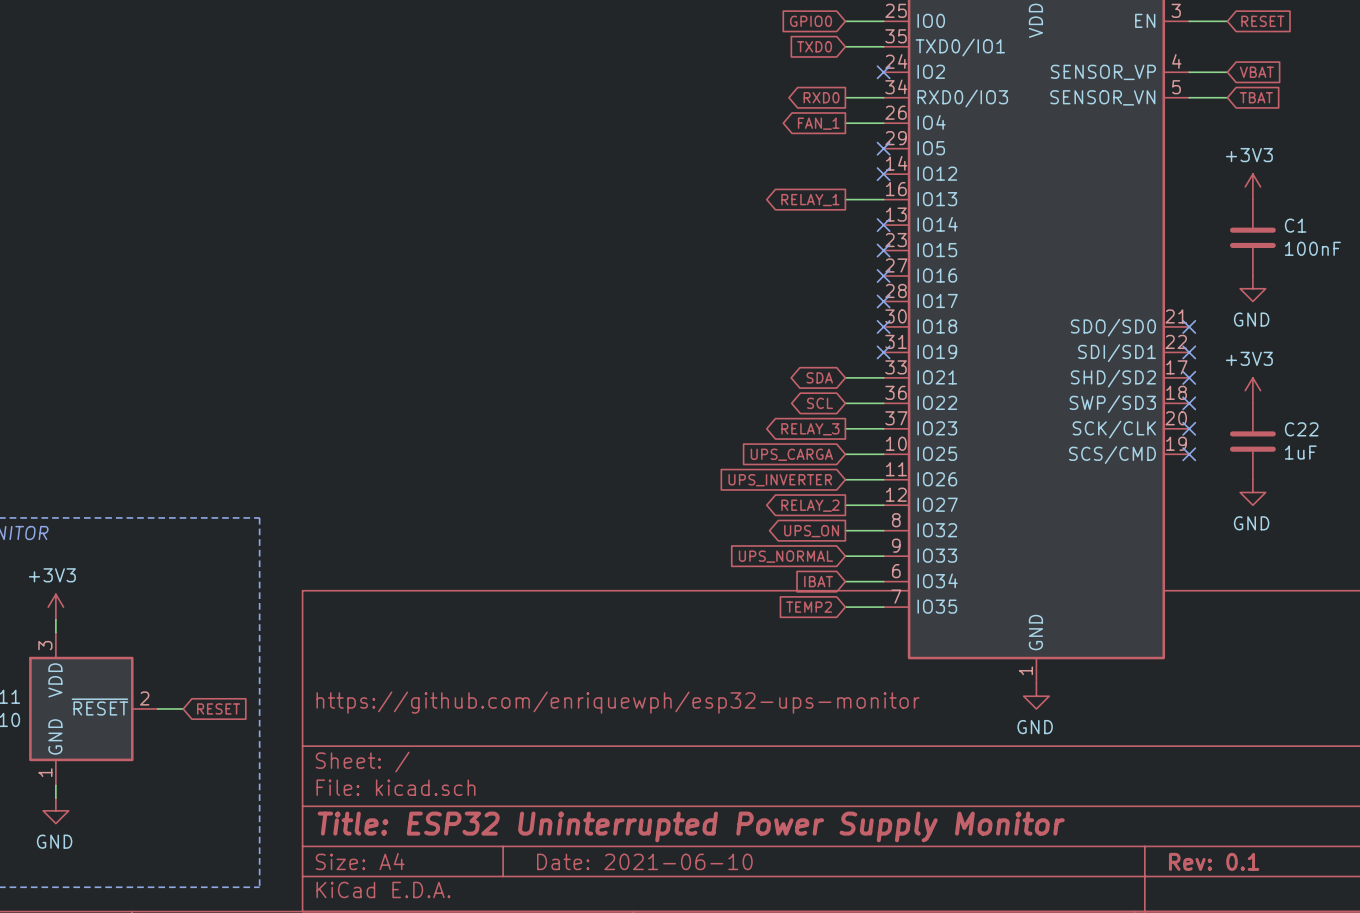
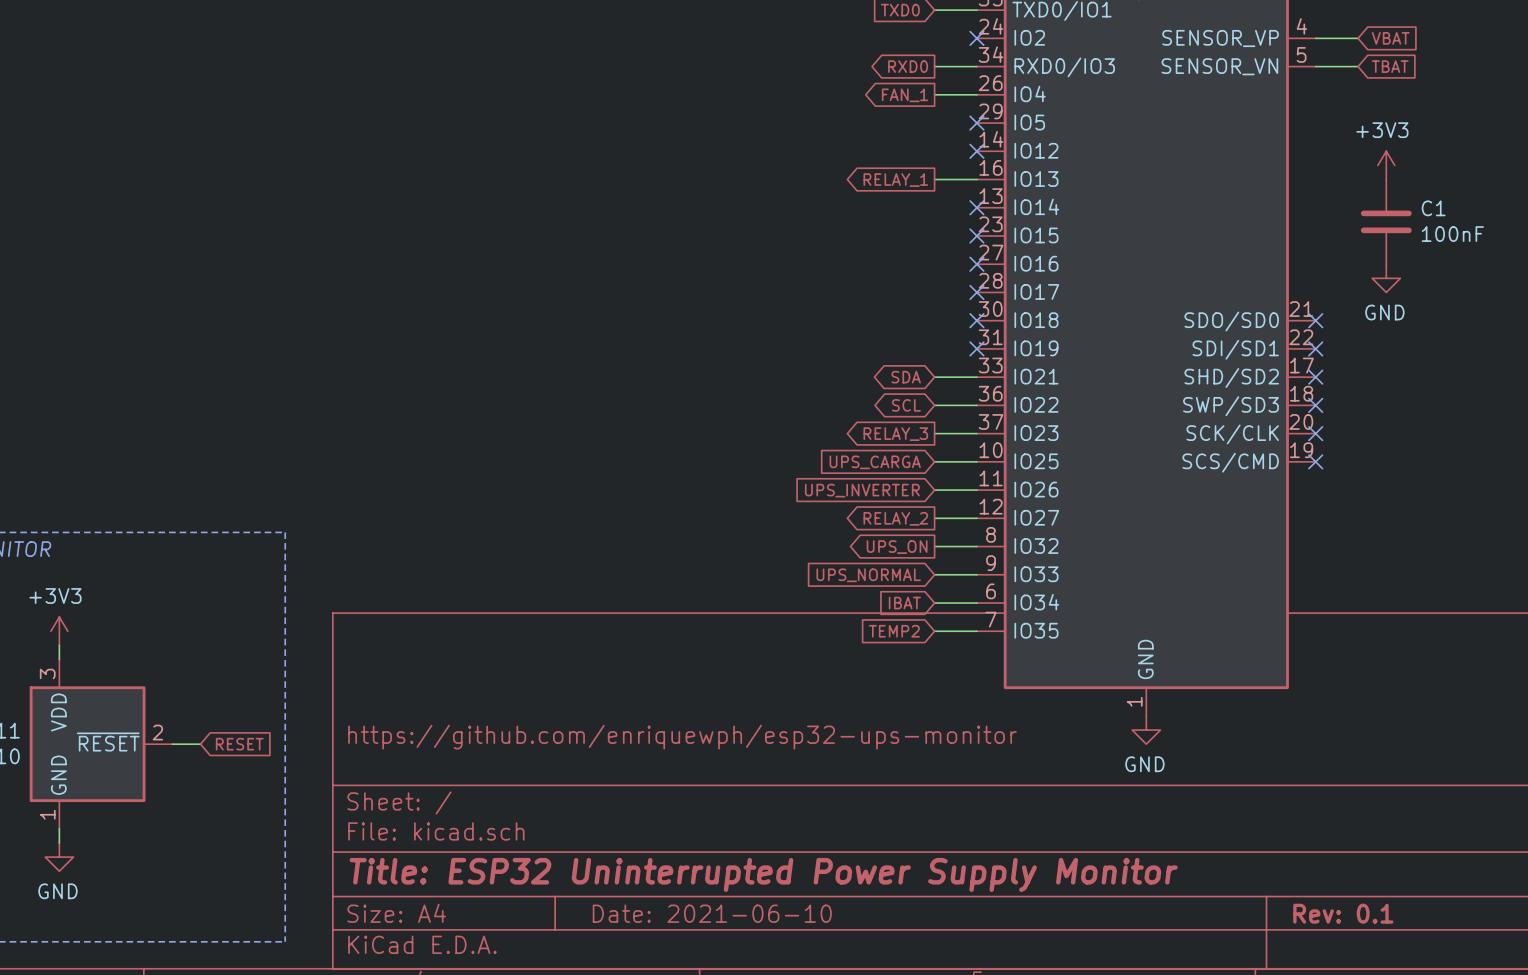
power symbol: +3V3 (1252, 390) -> none
C22: 1uF (1252, 441) -> none
power symbol: GND (1252, 492) -> none

